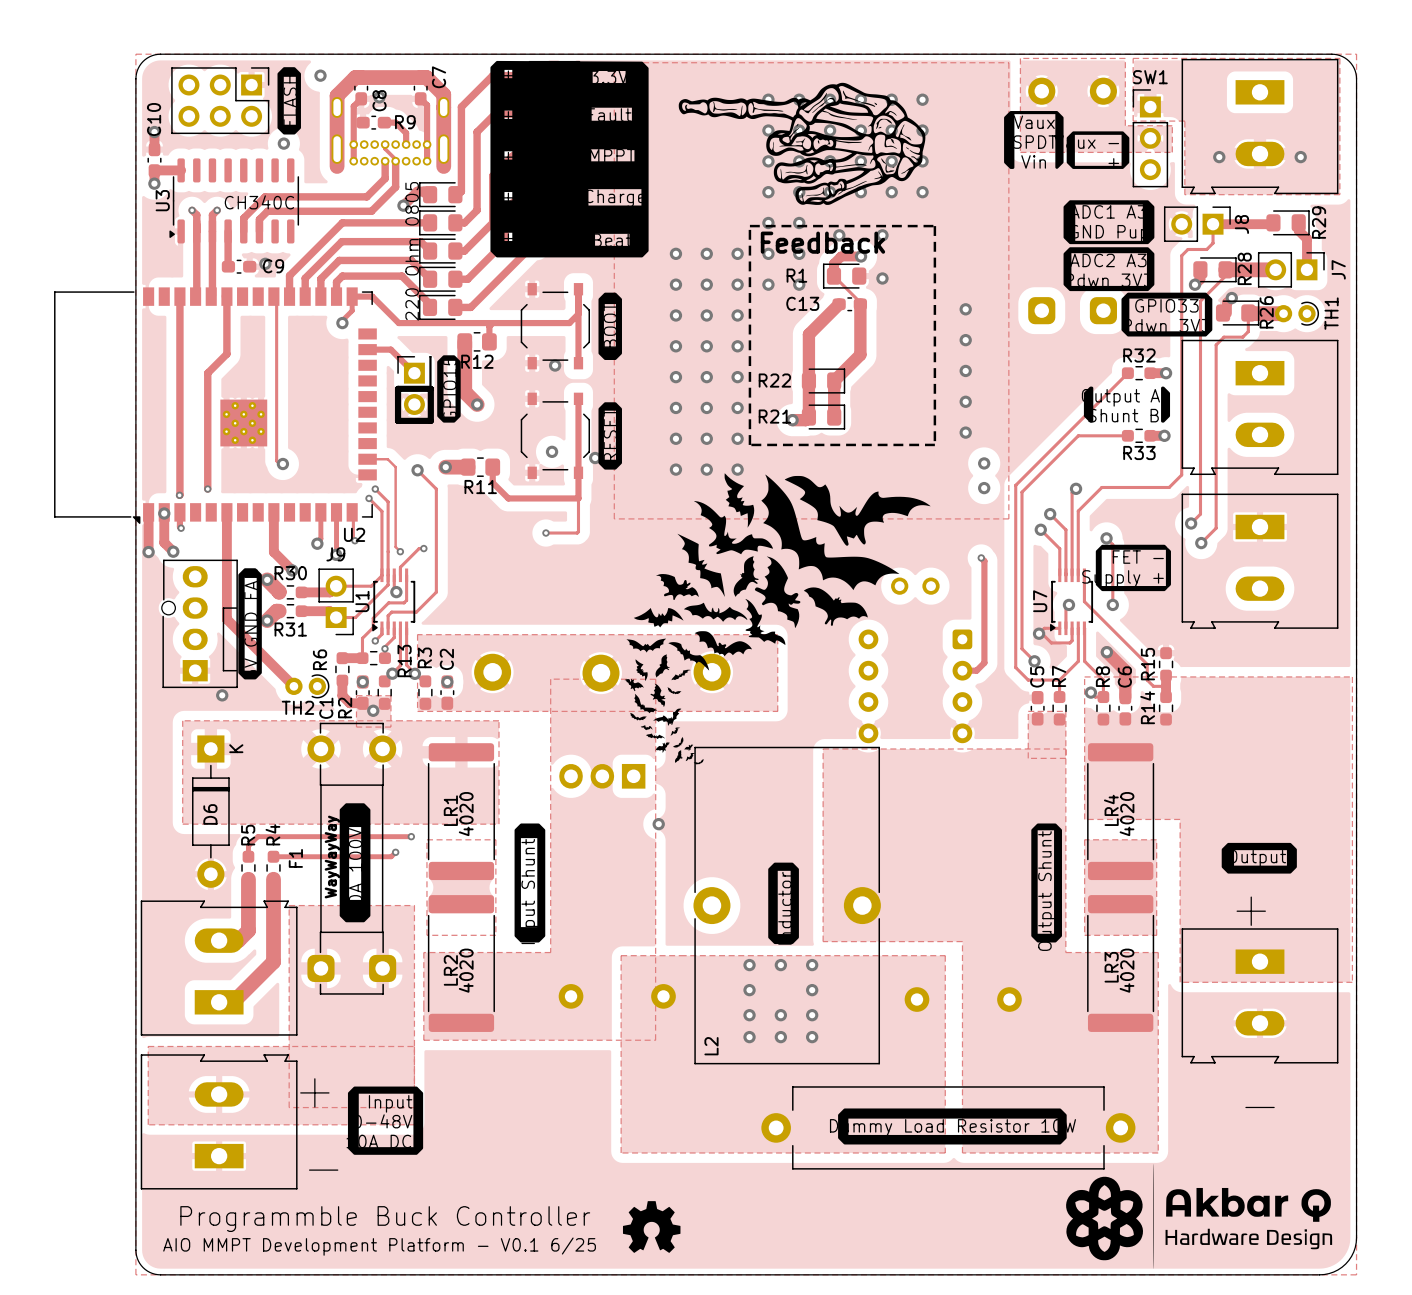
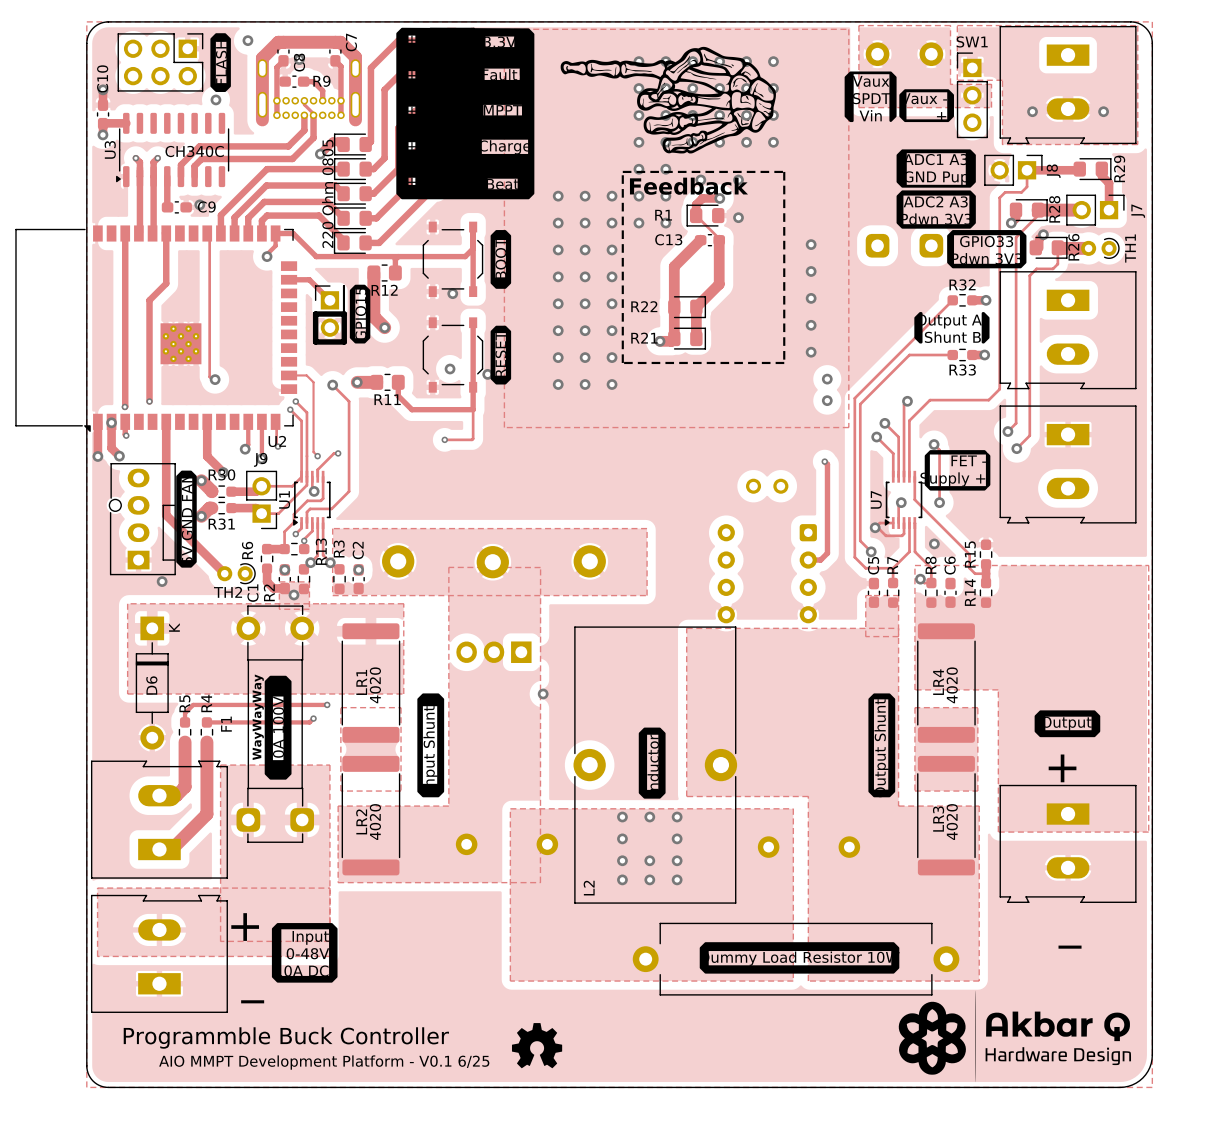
drawing: [624, 473, 931, 765] -> none
track: (1106, 652) (1125, 670) (1125, 697) -> none

